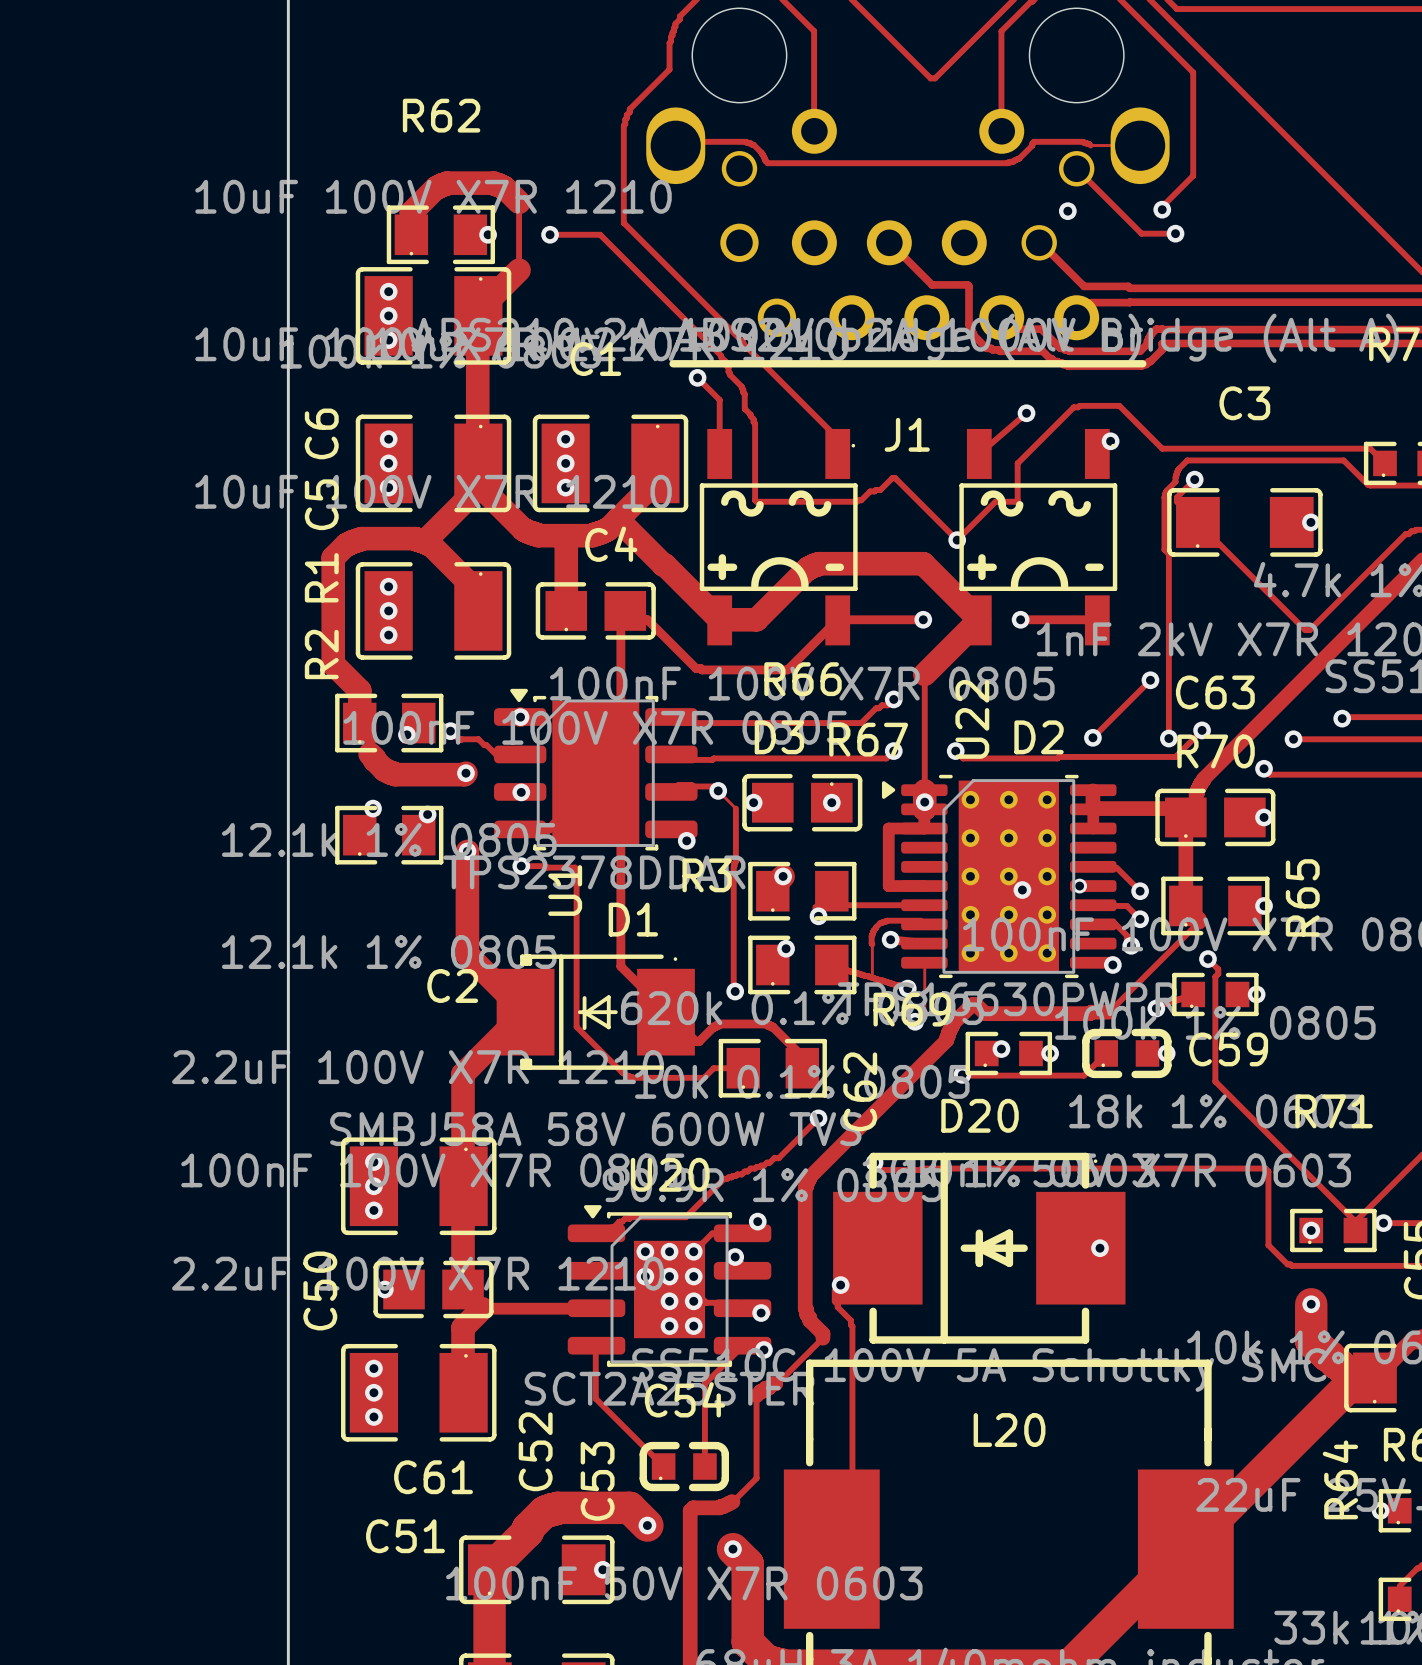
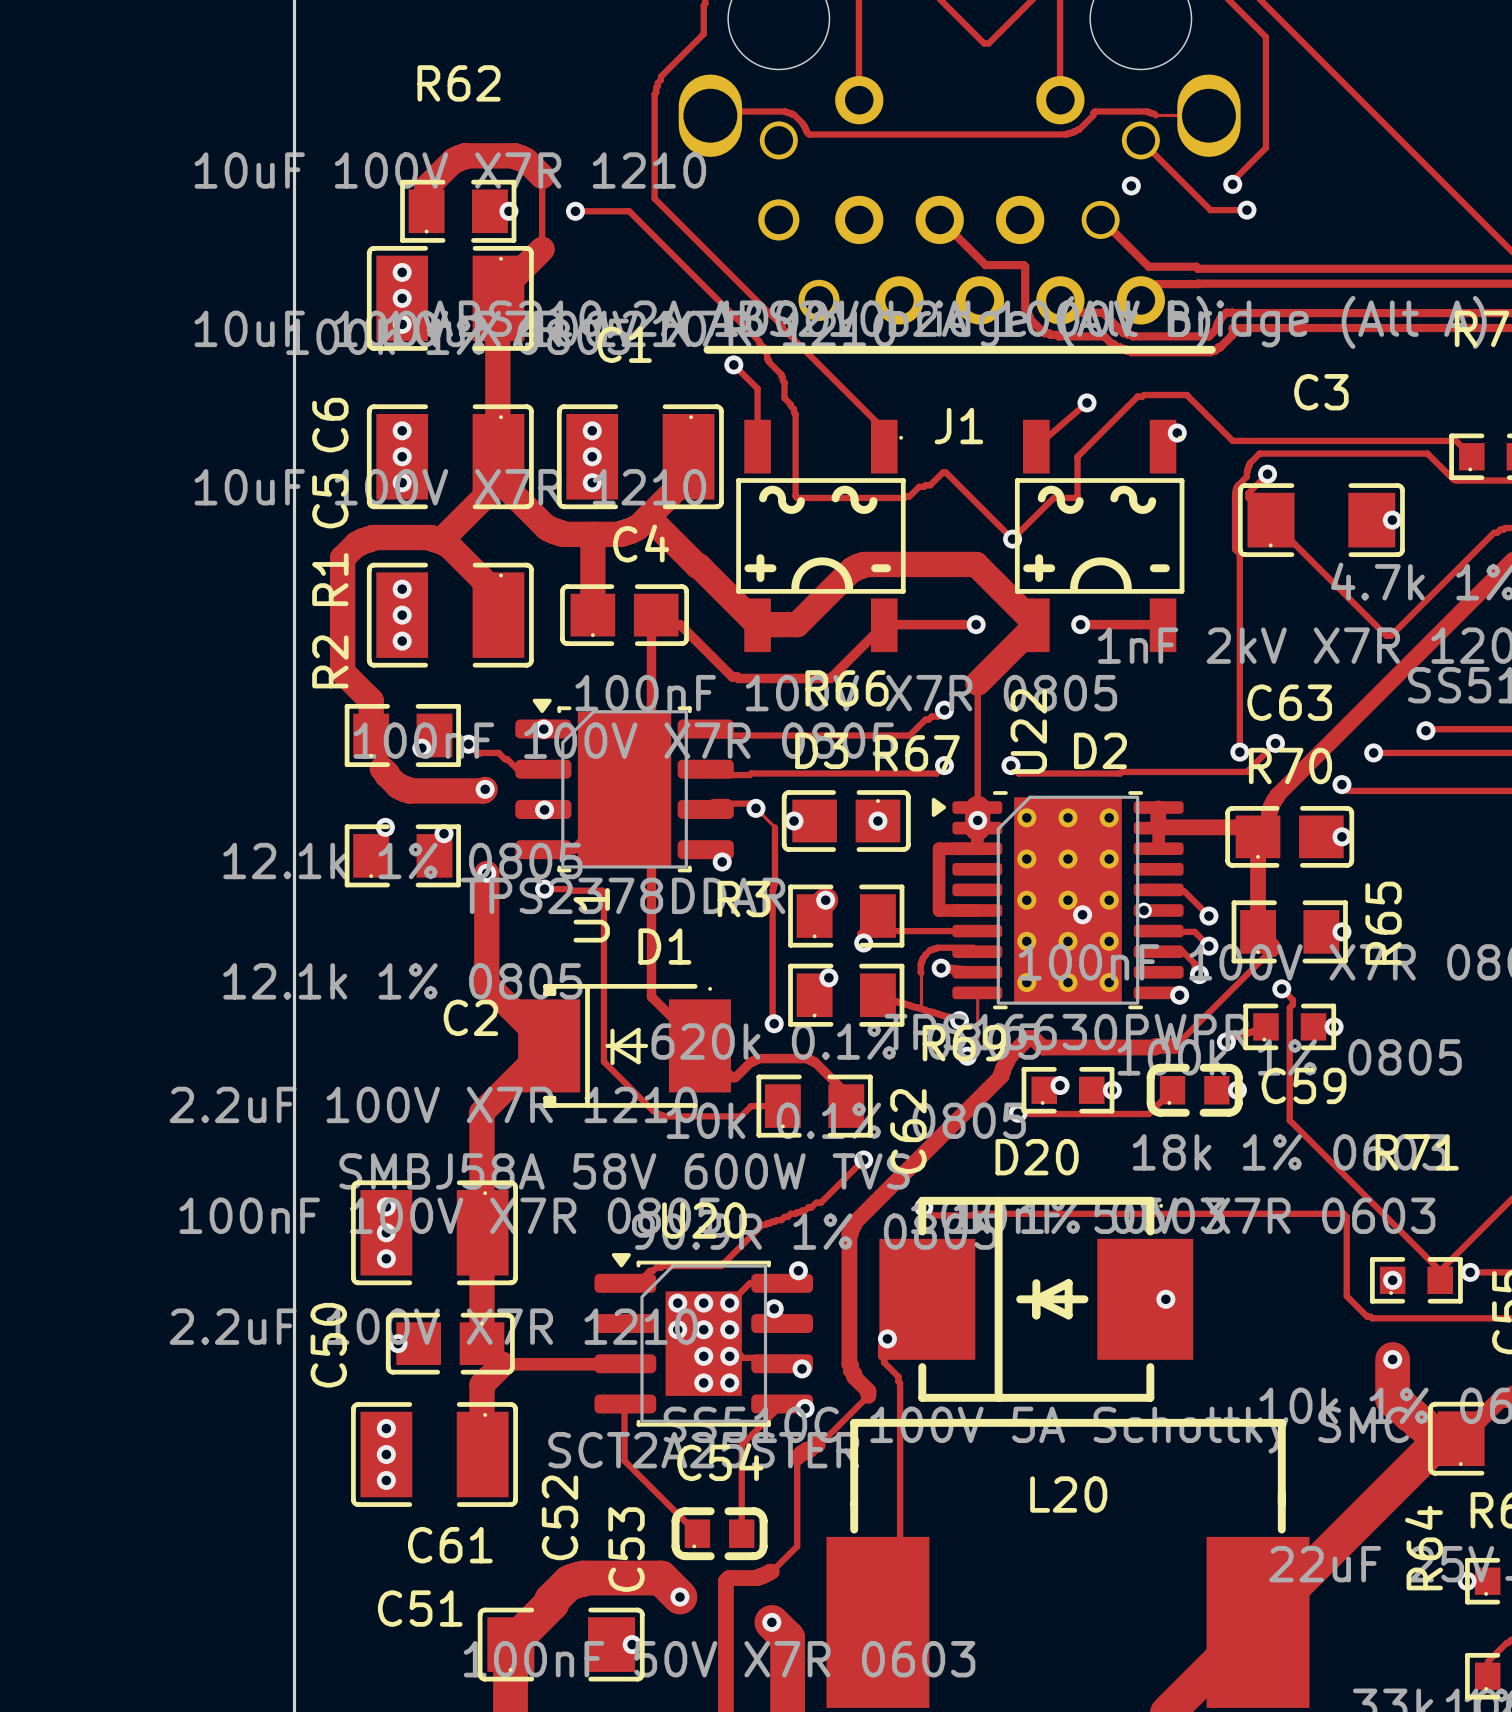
track: (1150, 680) (1092, 737) -> none
via: (1150, 680) -> none
via: (1092, 737) -> none

